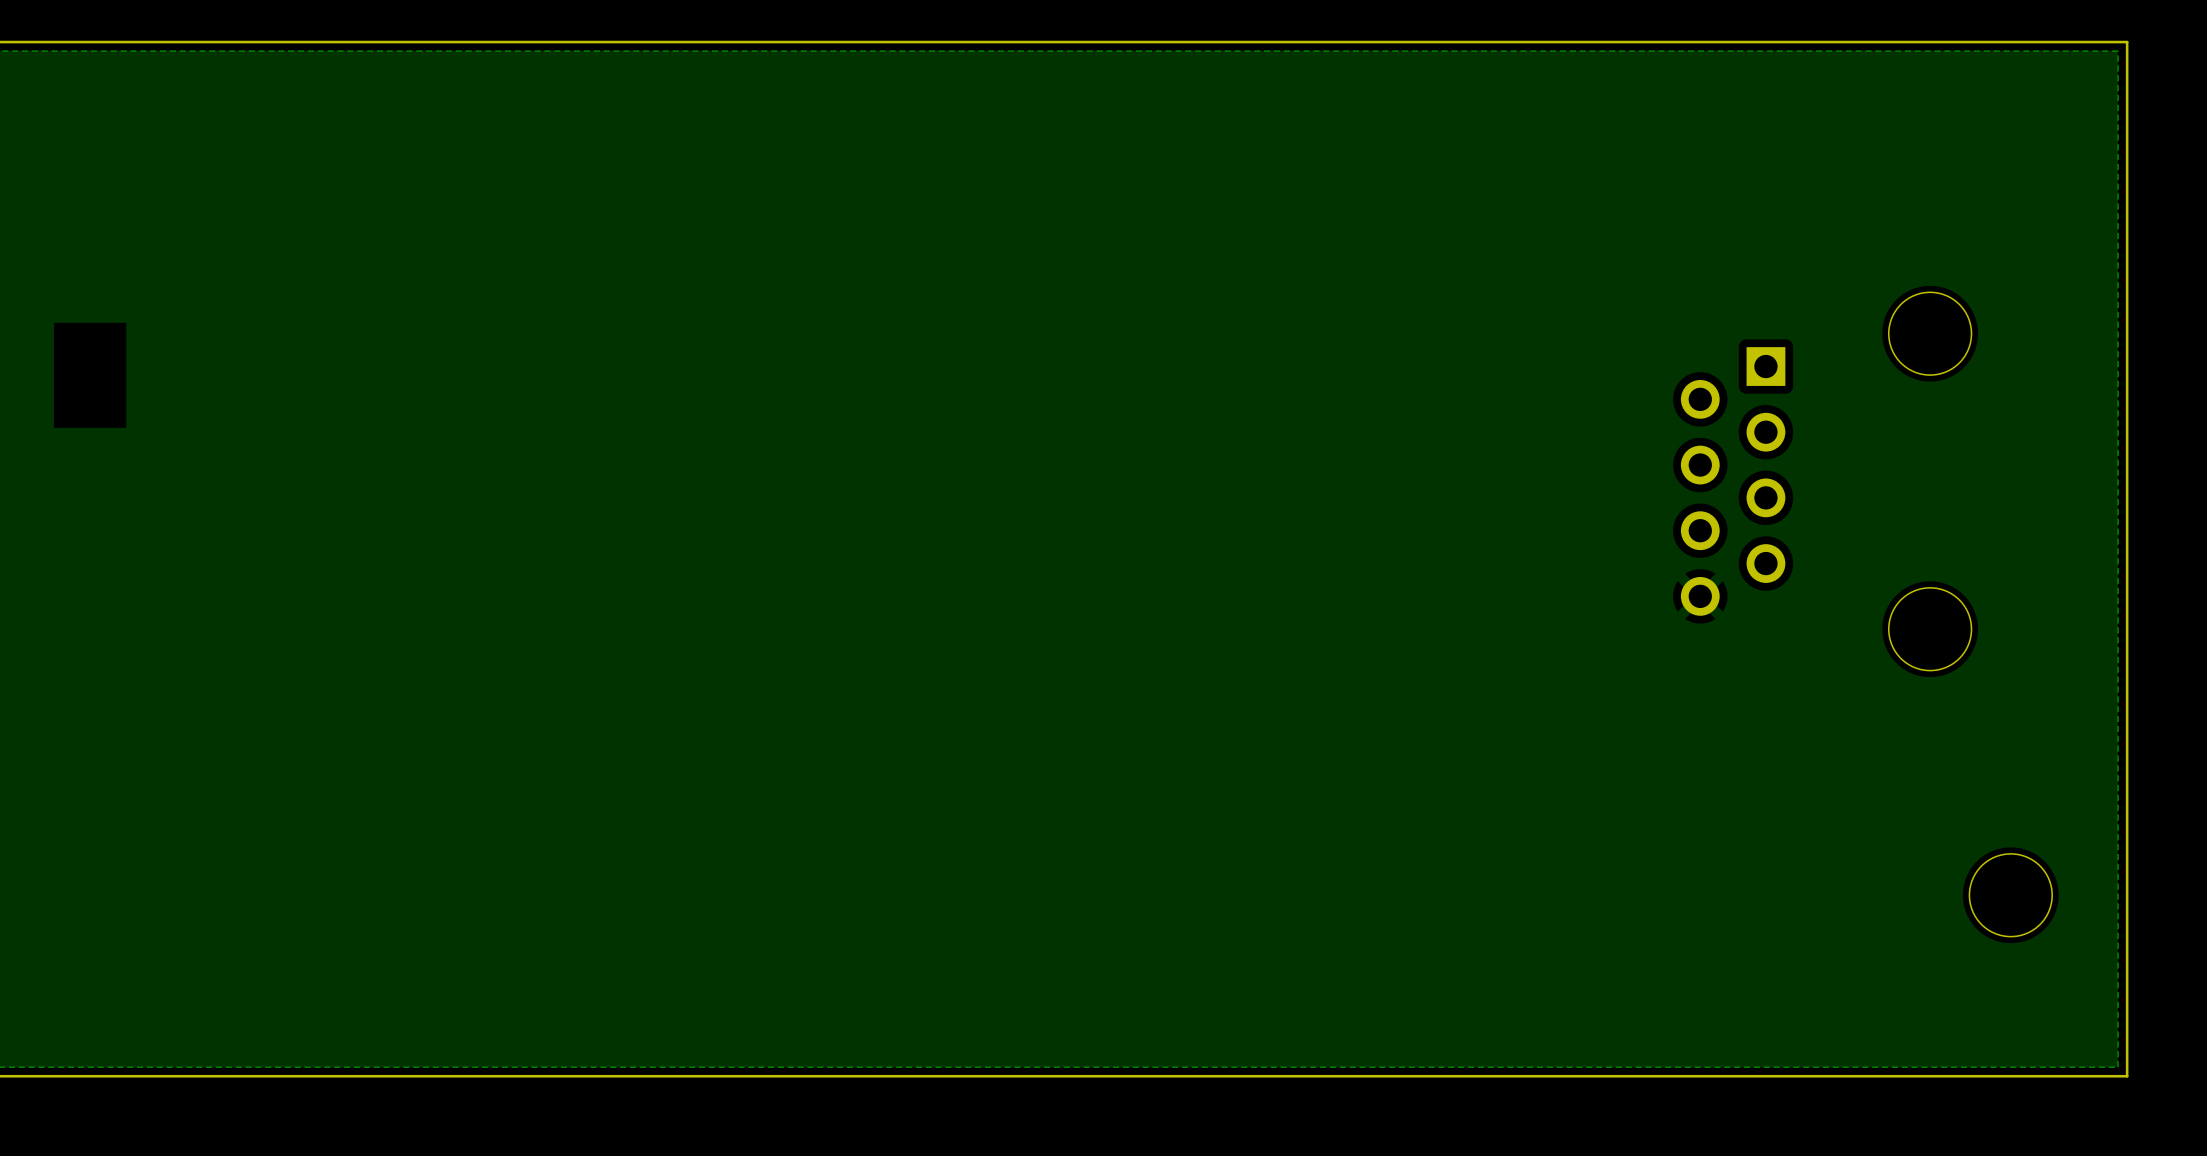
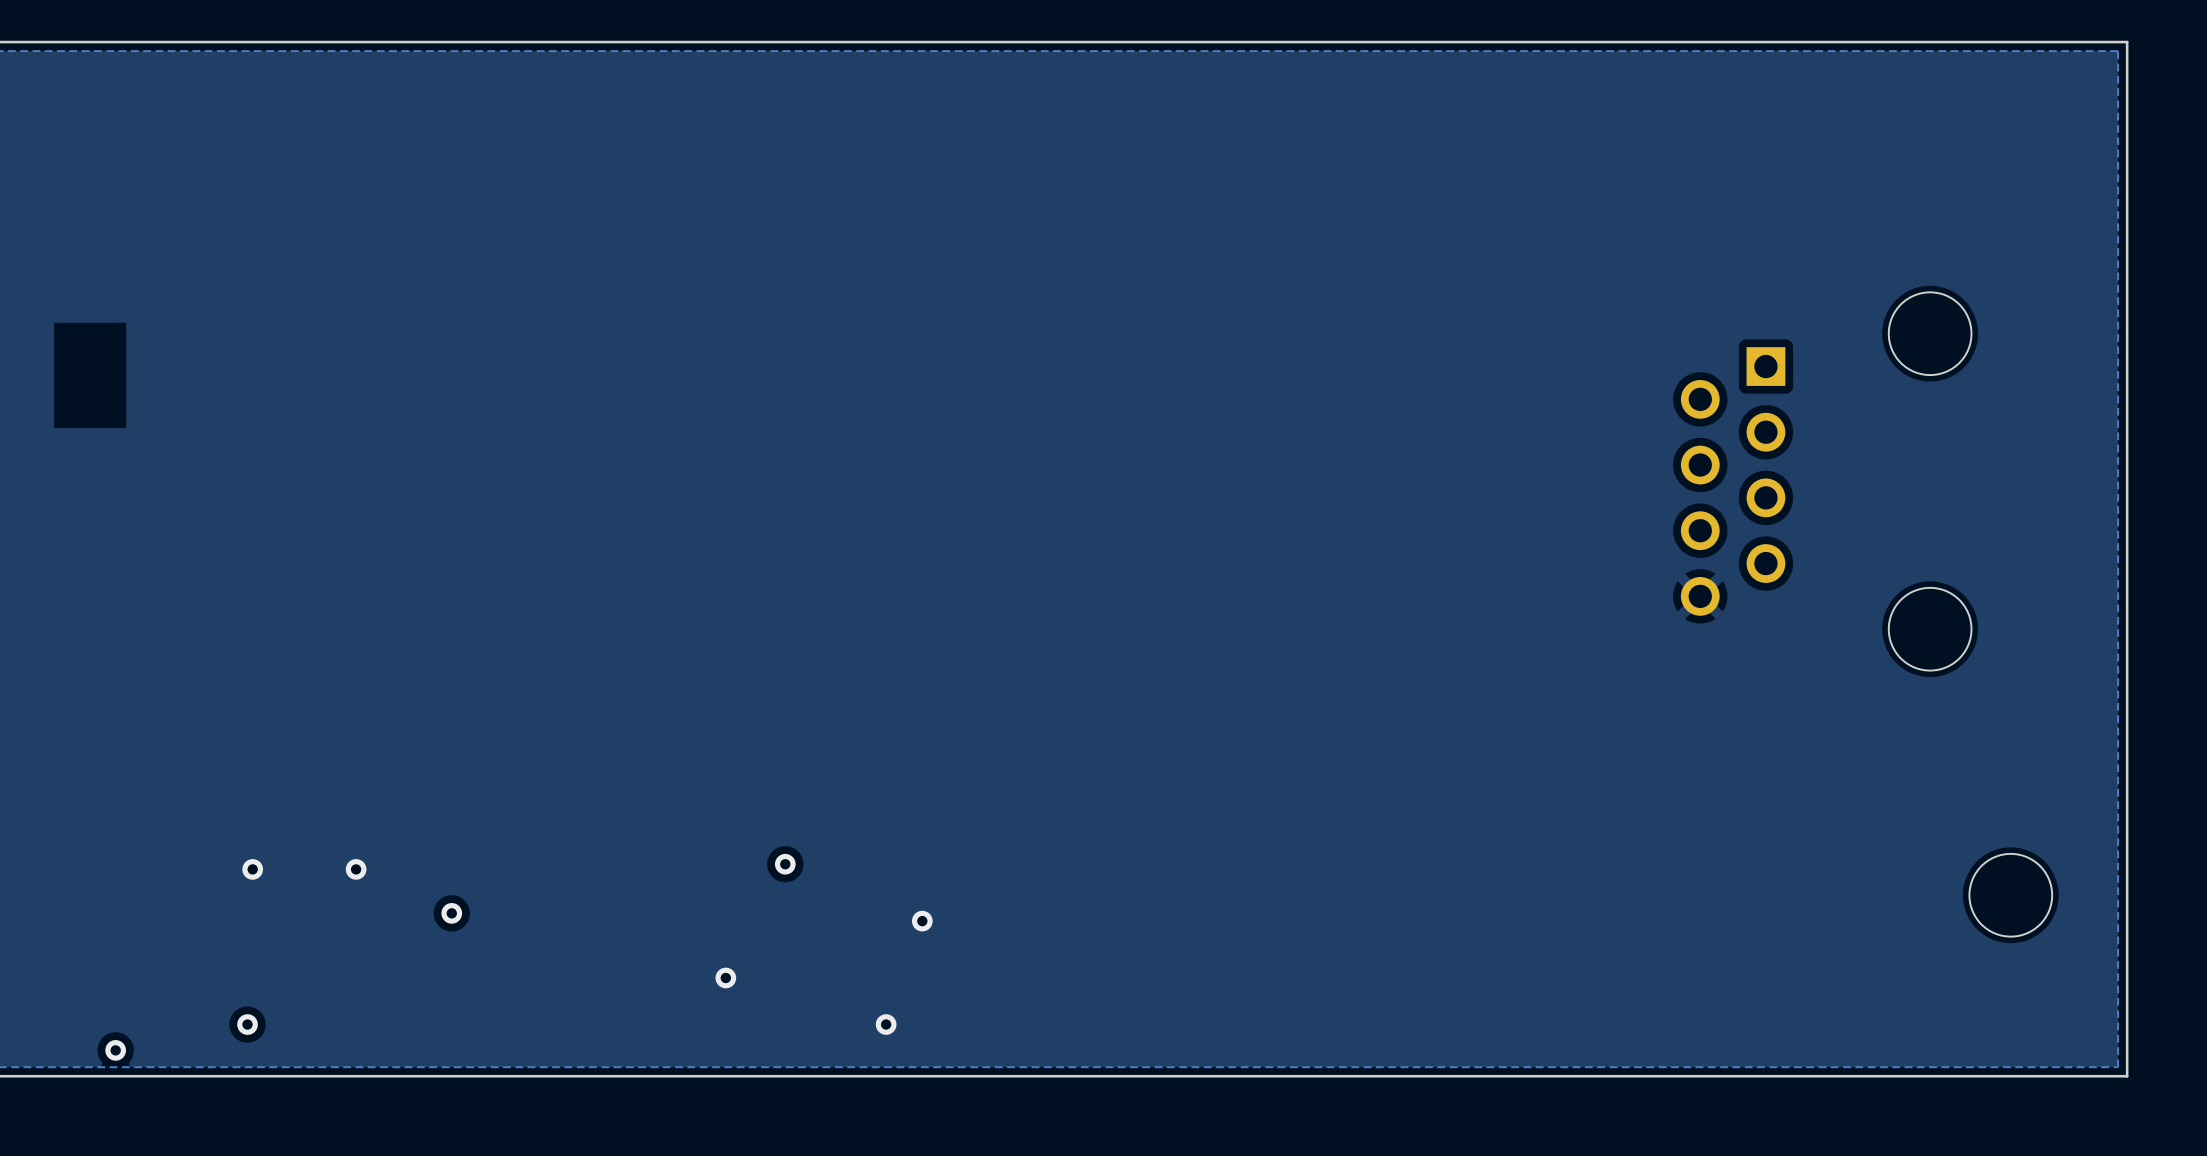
via: none -> (785, 864)
via: none -> (252, 869)
via: none -> (356, 869)
via: none -> (451, 913)
via: none -> (922, 921)
via: none -> (725, 977)
via: none -> (247, 1024)
via: none -> (886, 1024)
via: none -> (115, 1050)

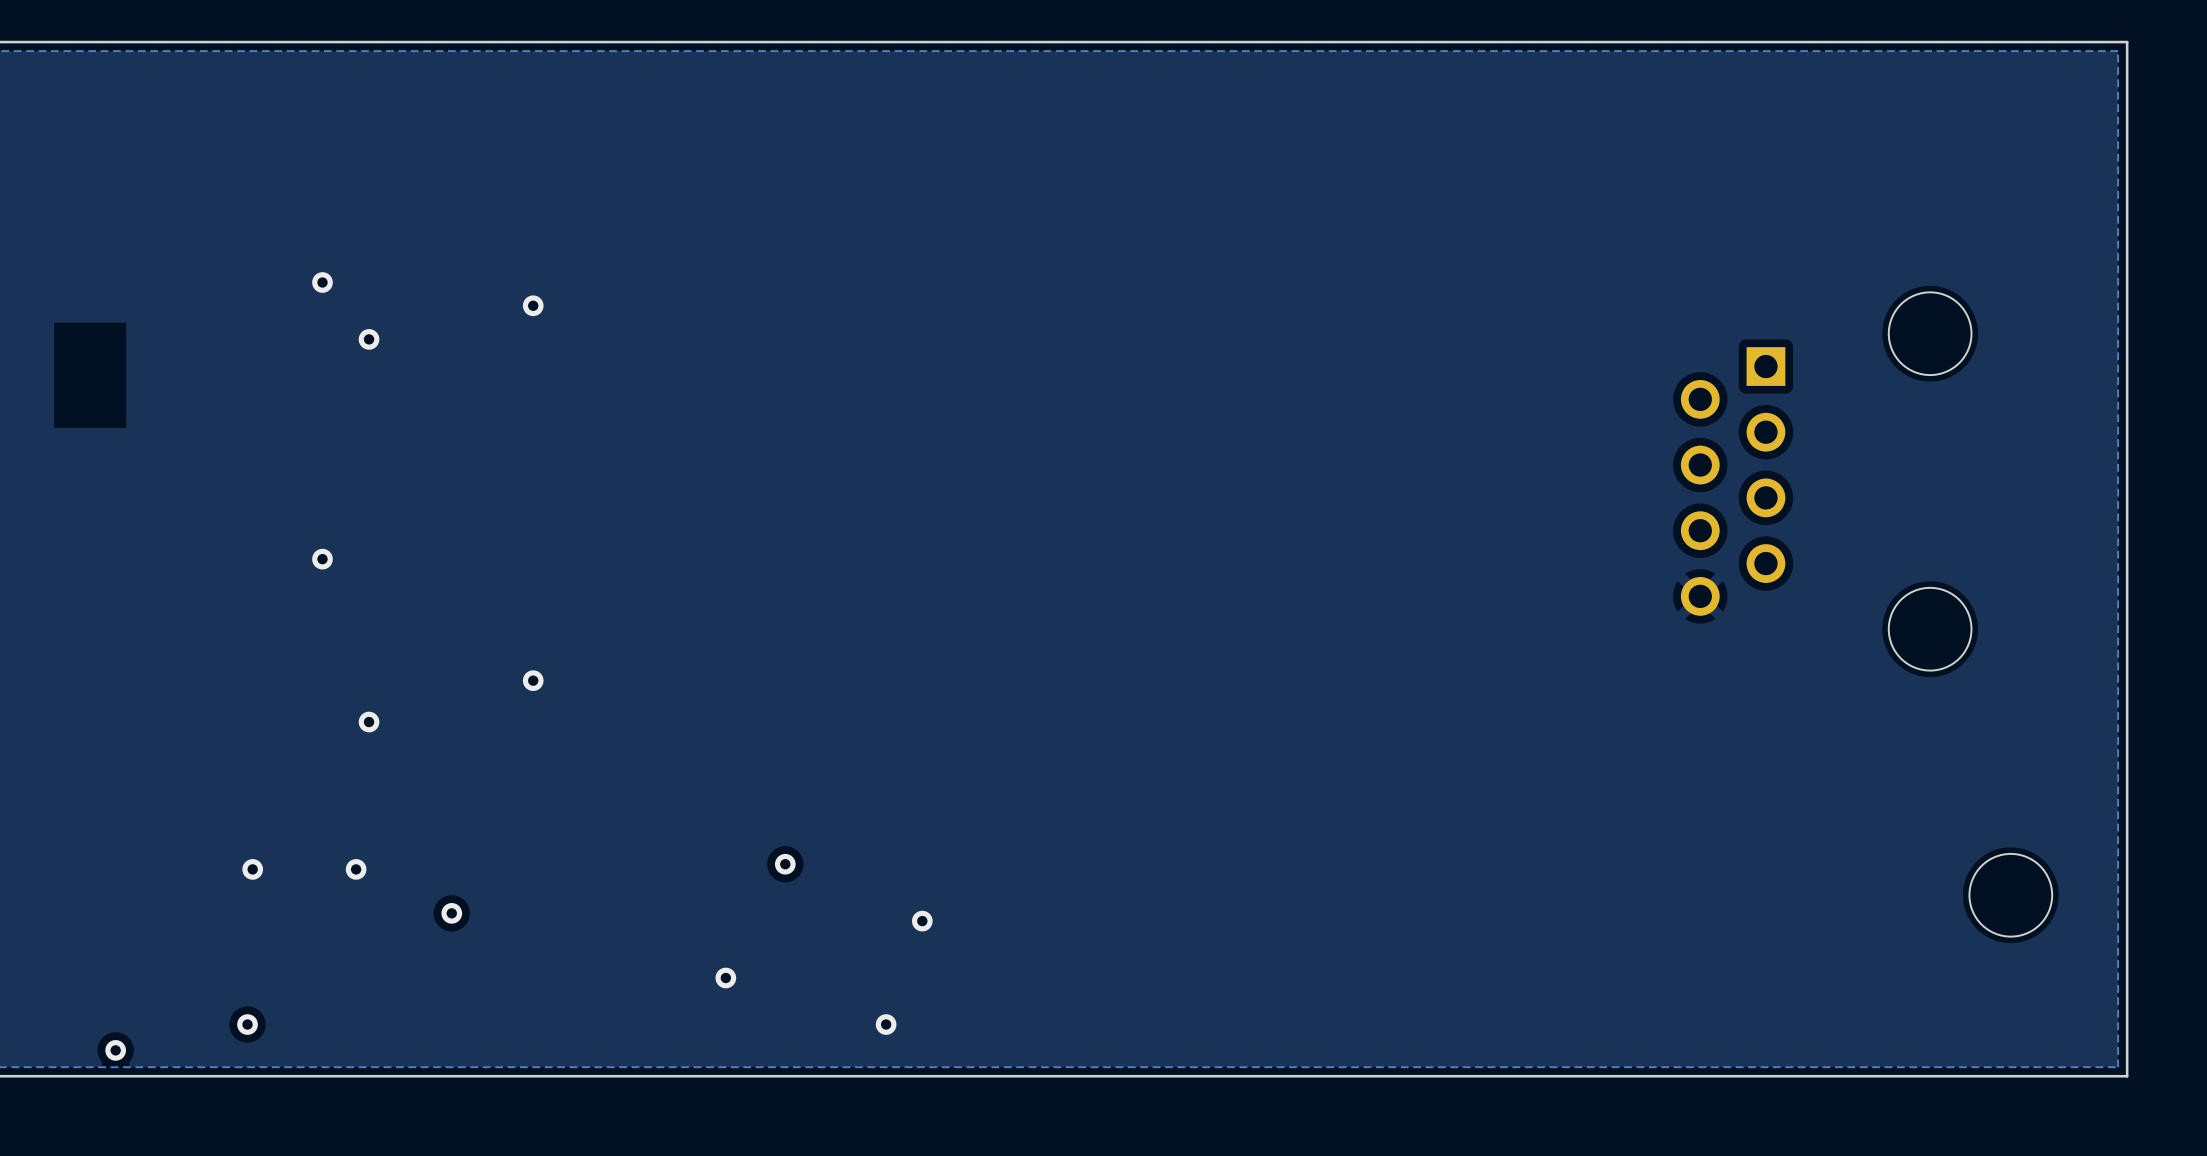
via: none -> (322, 282)
via: none -> (533, 305)
via: none -> (369, 339)
via: none -> (322, 559)
via: none -> (533, 680)
via: none -> (369, 722)

